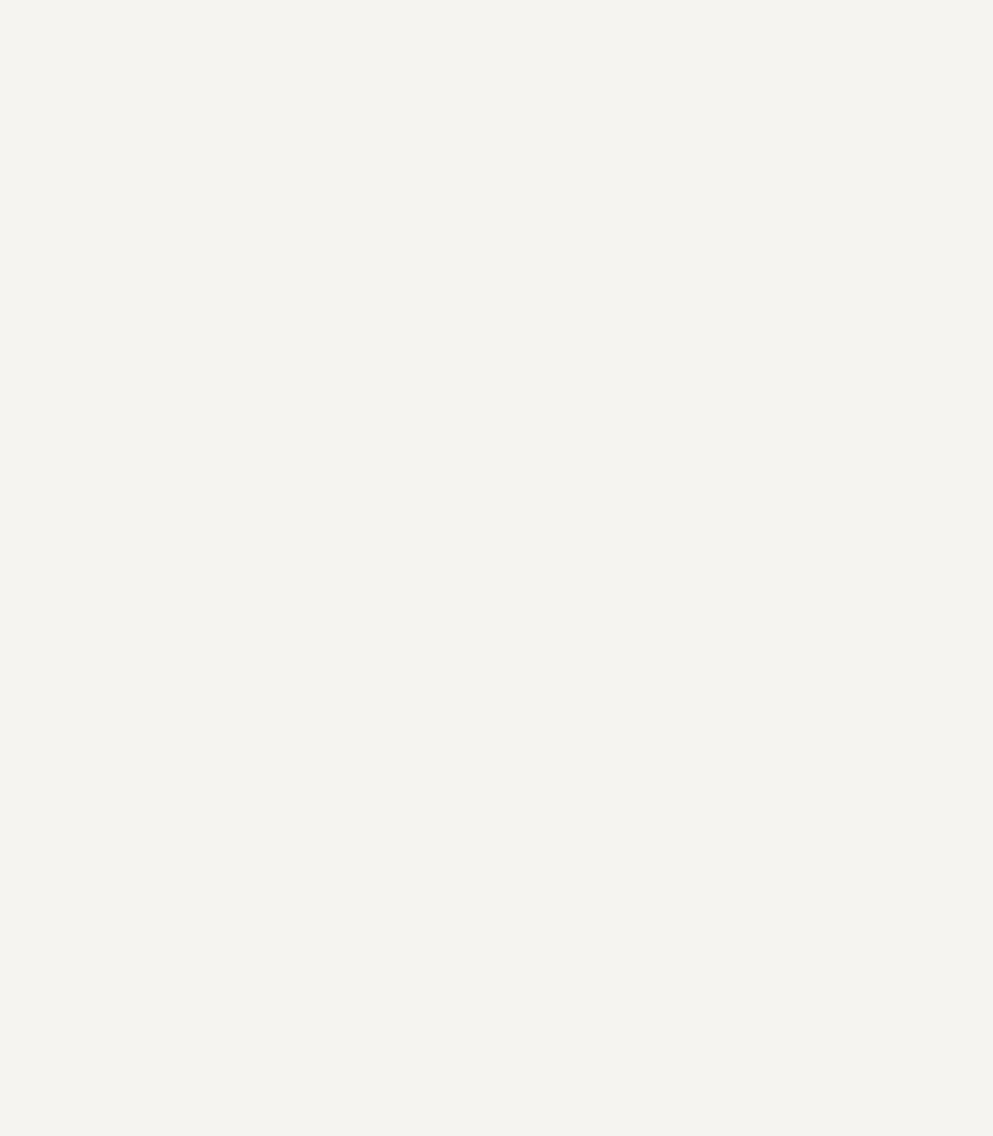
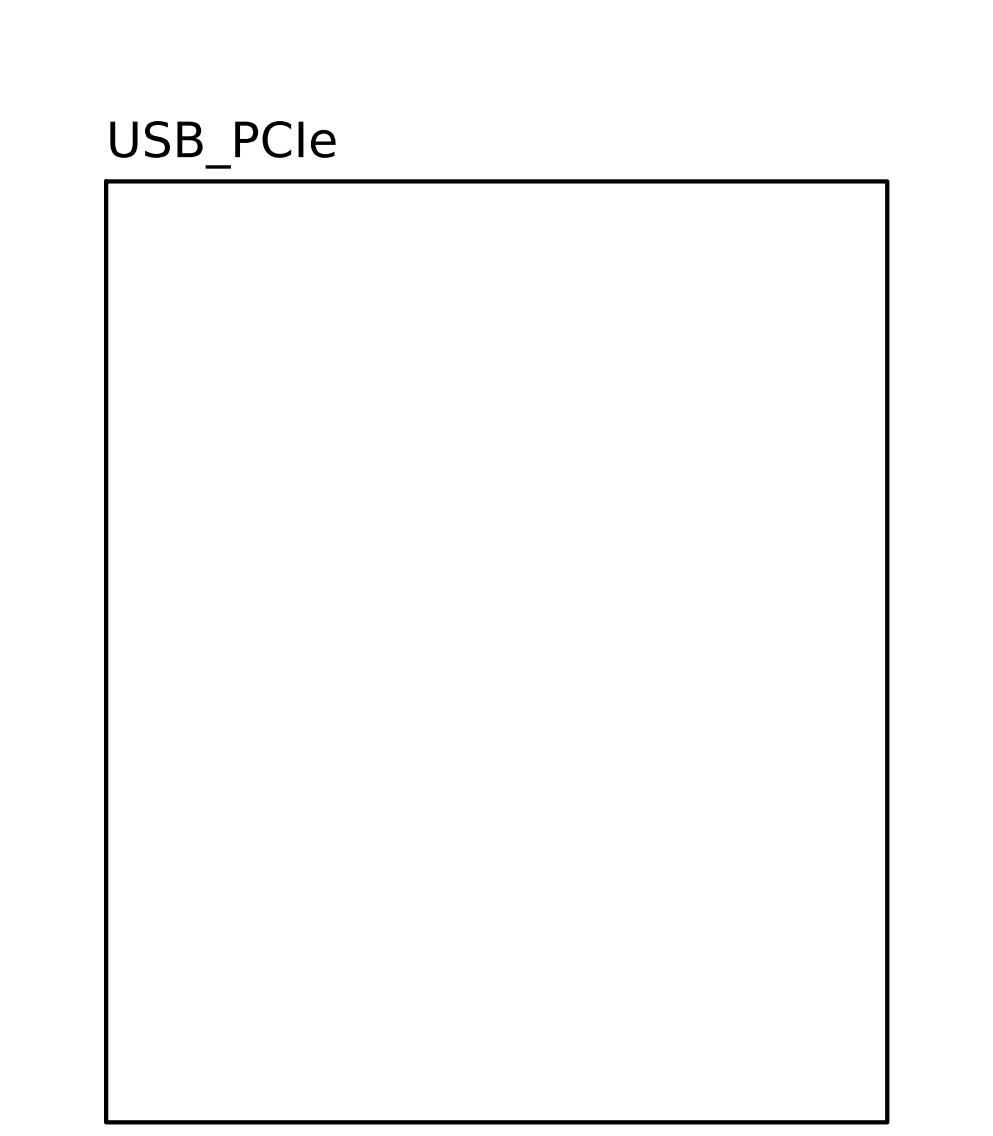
sheet USB_PCIe: none -> (496, 651)

